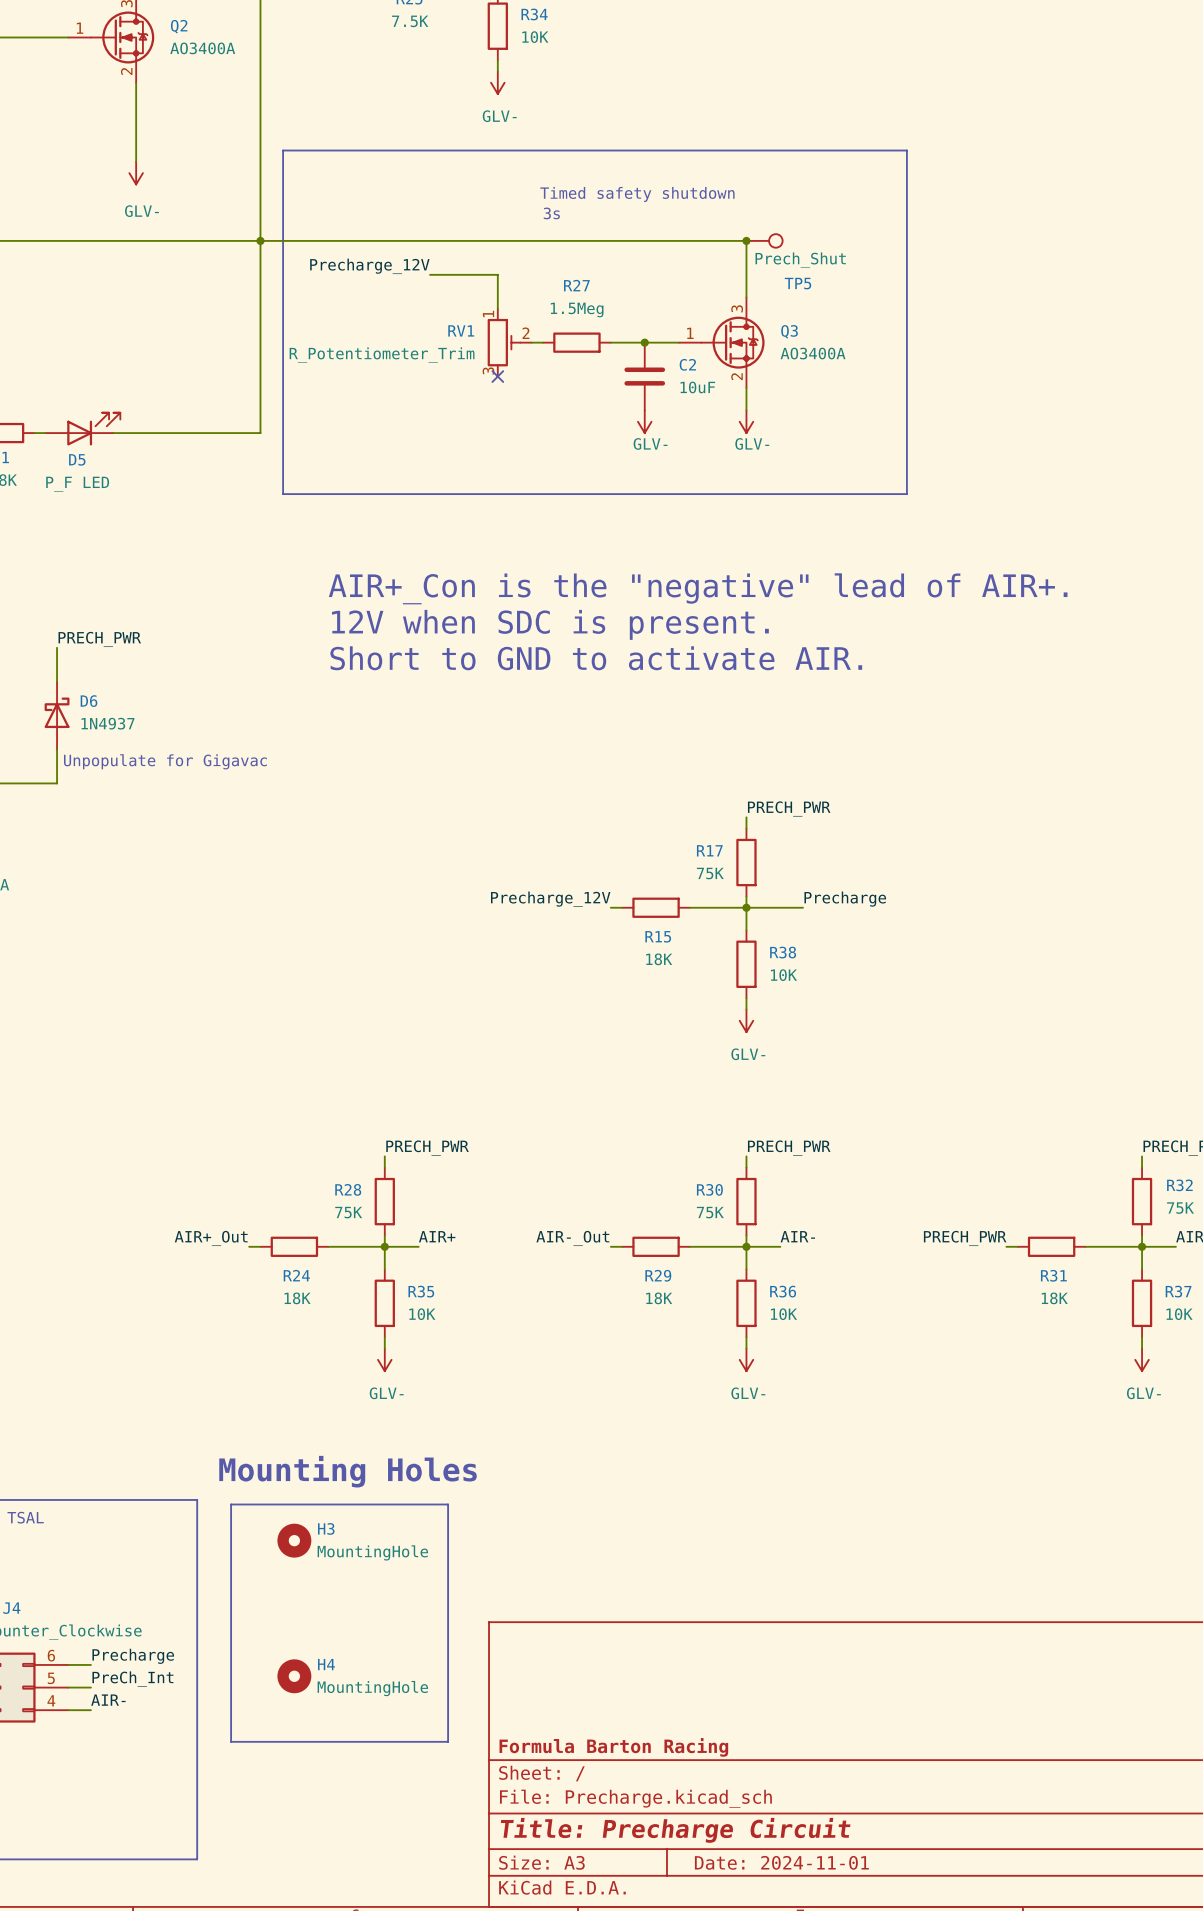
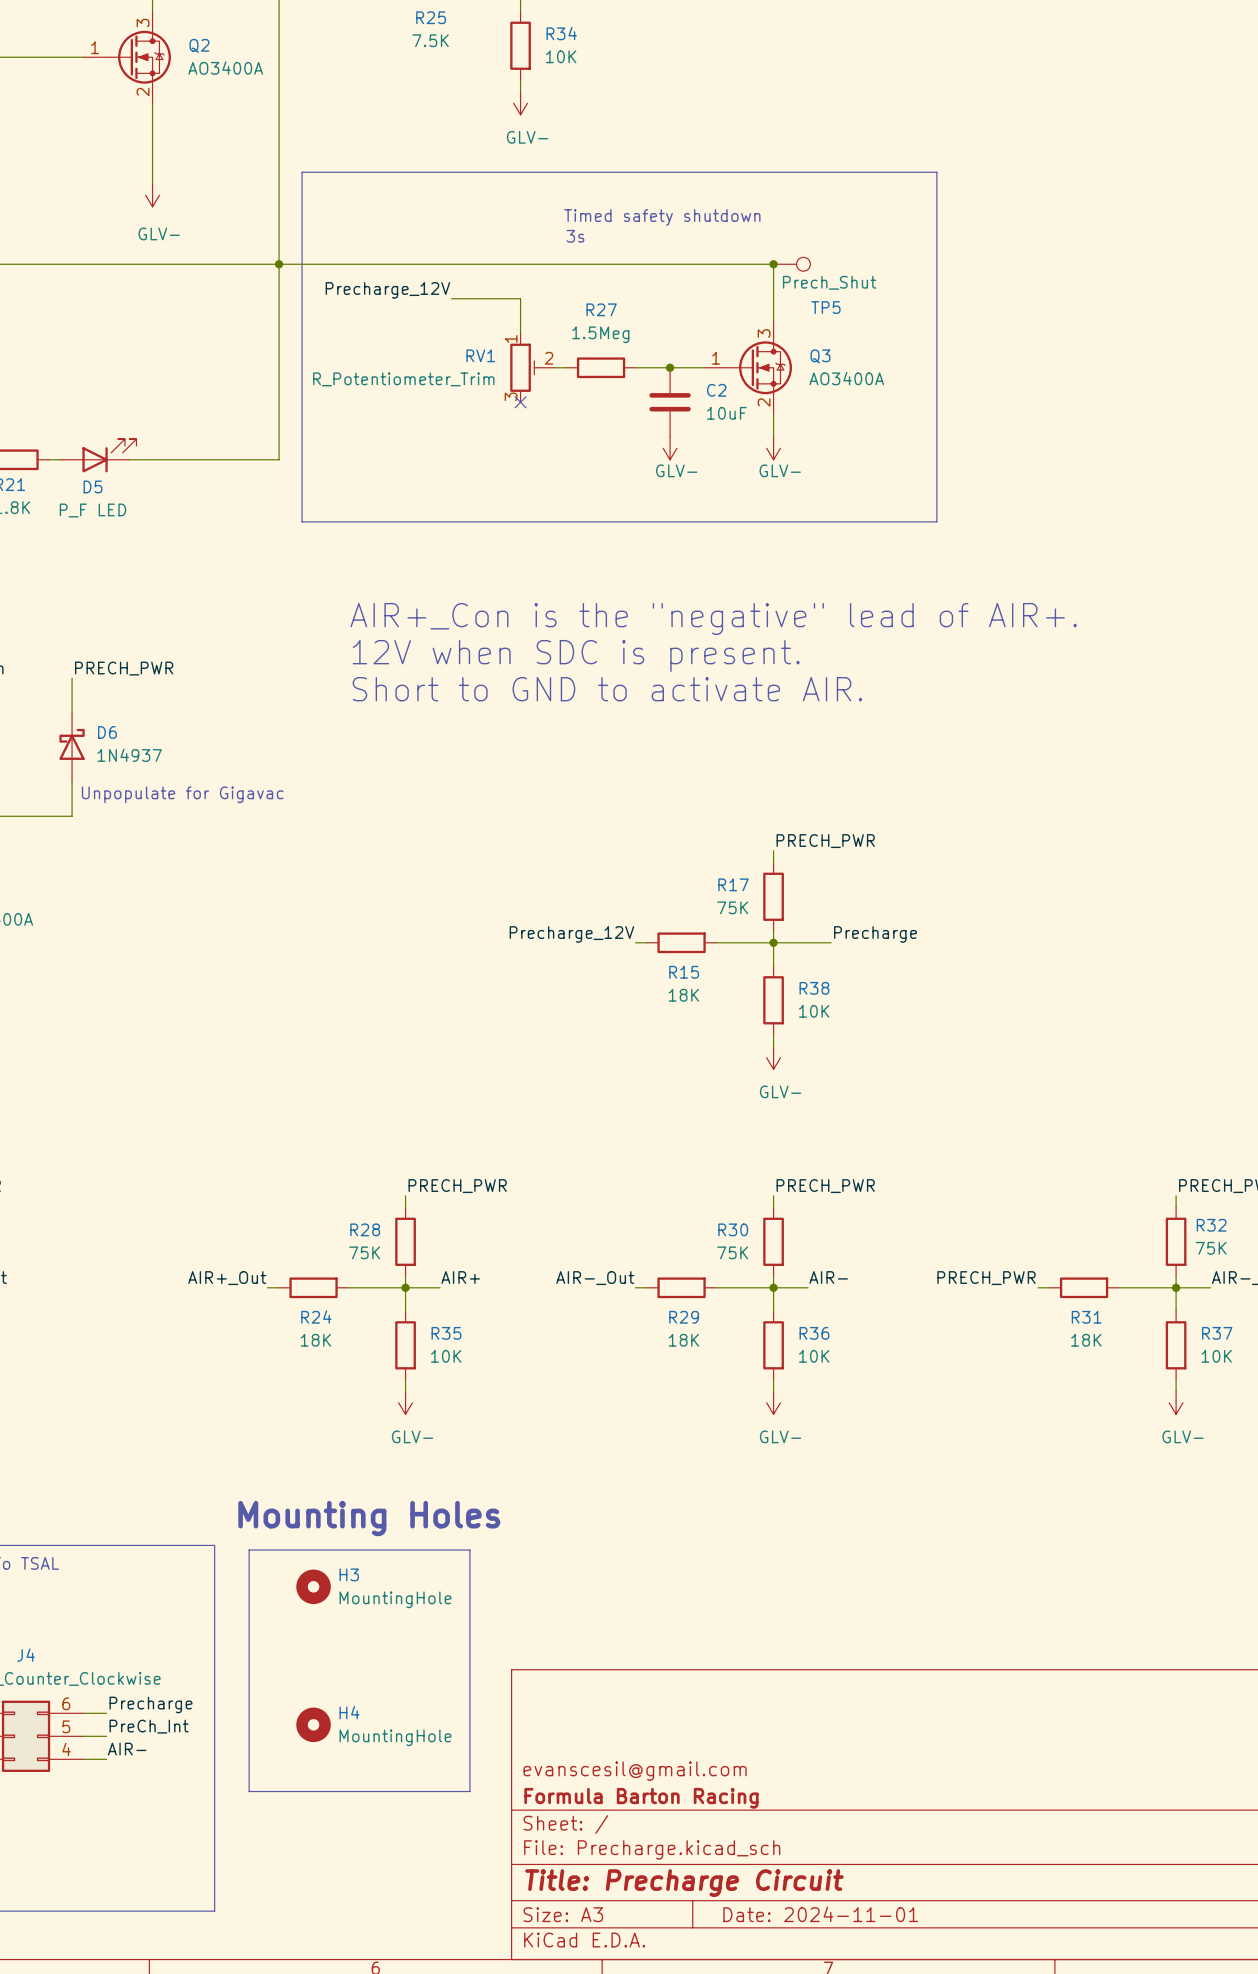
title block: none -> evanscesil@gmail.com (635, 1771)

